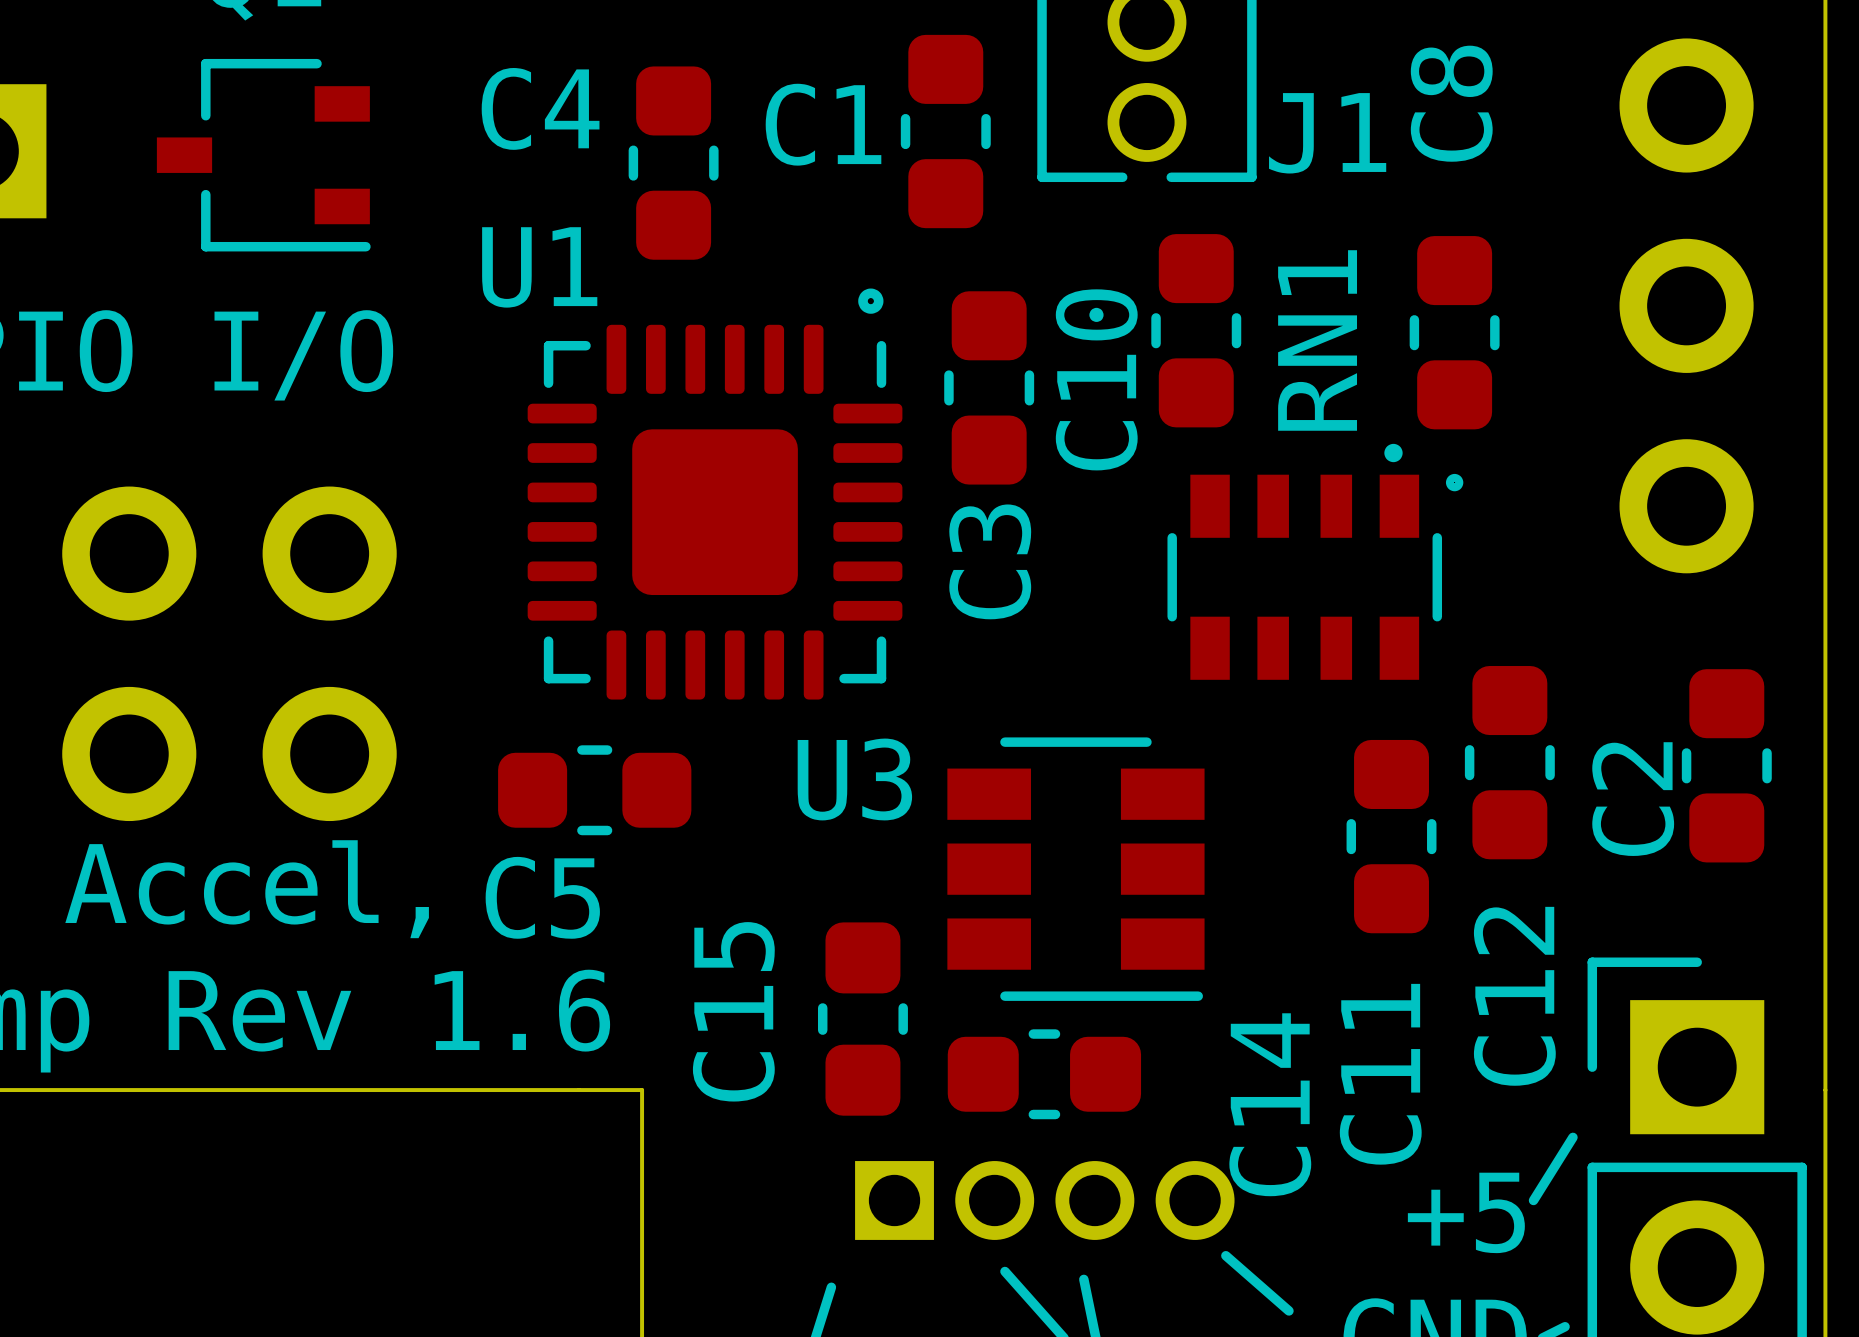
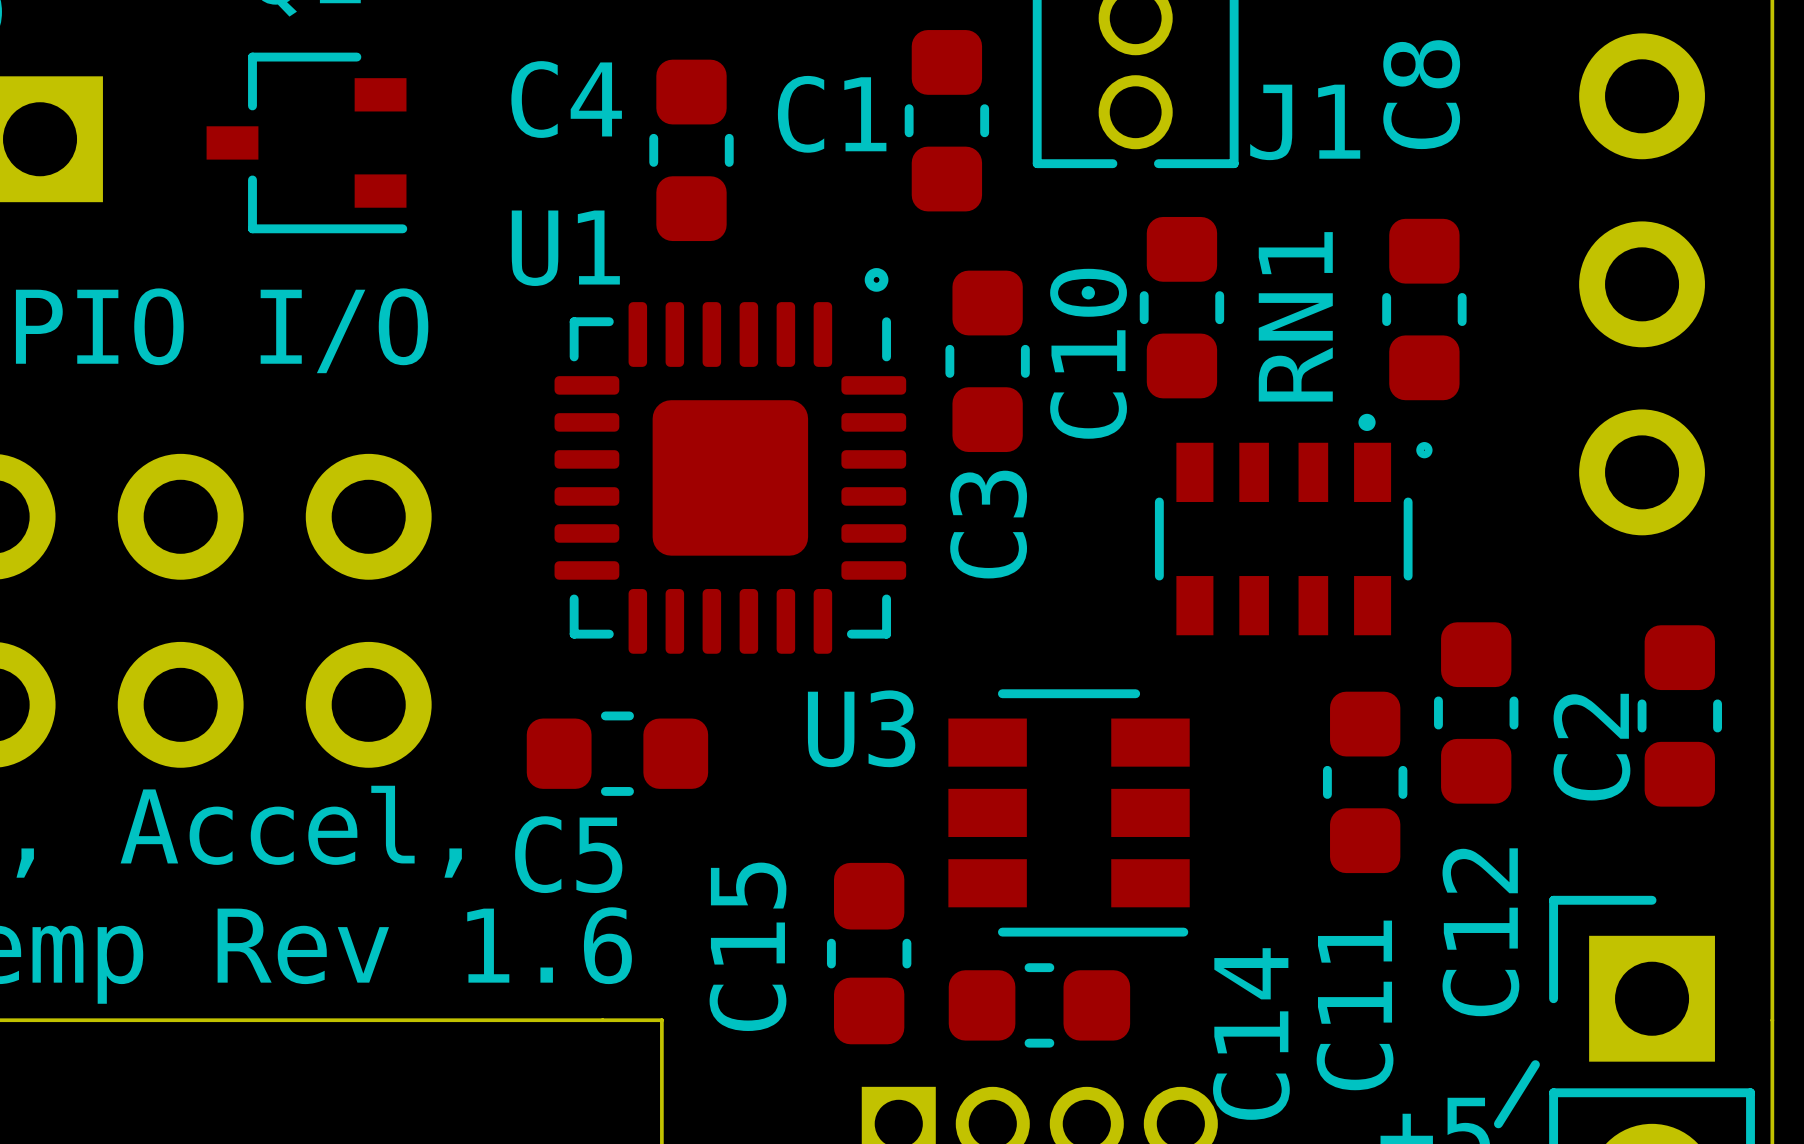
C5 position: (594, 790) -> (617, 753)

